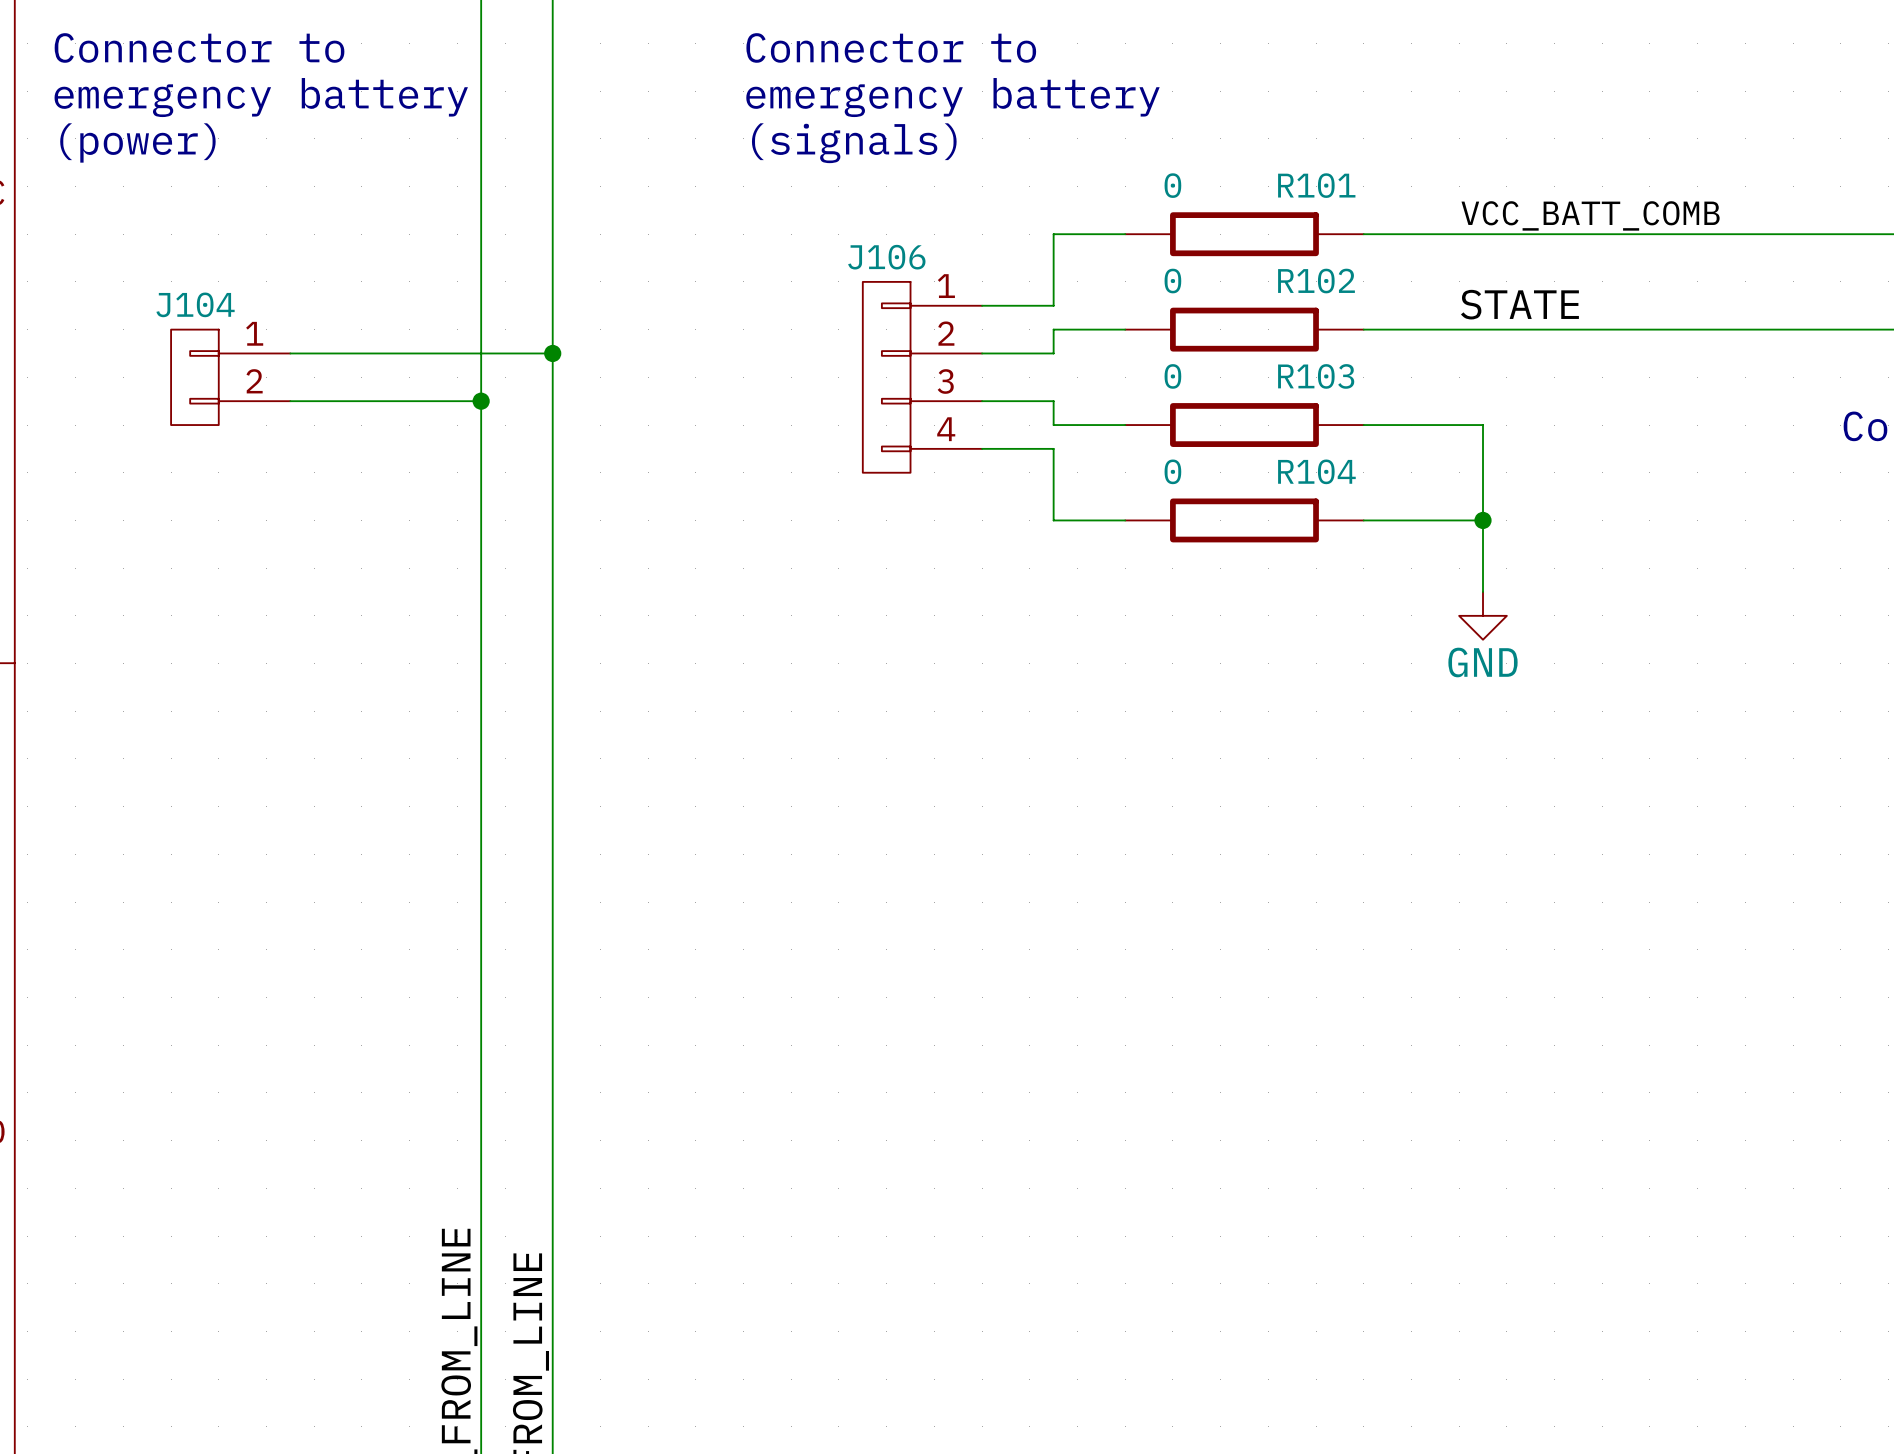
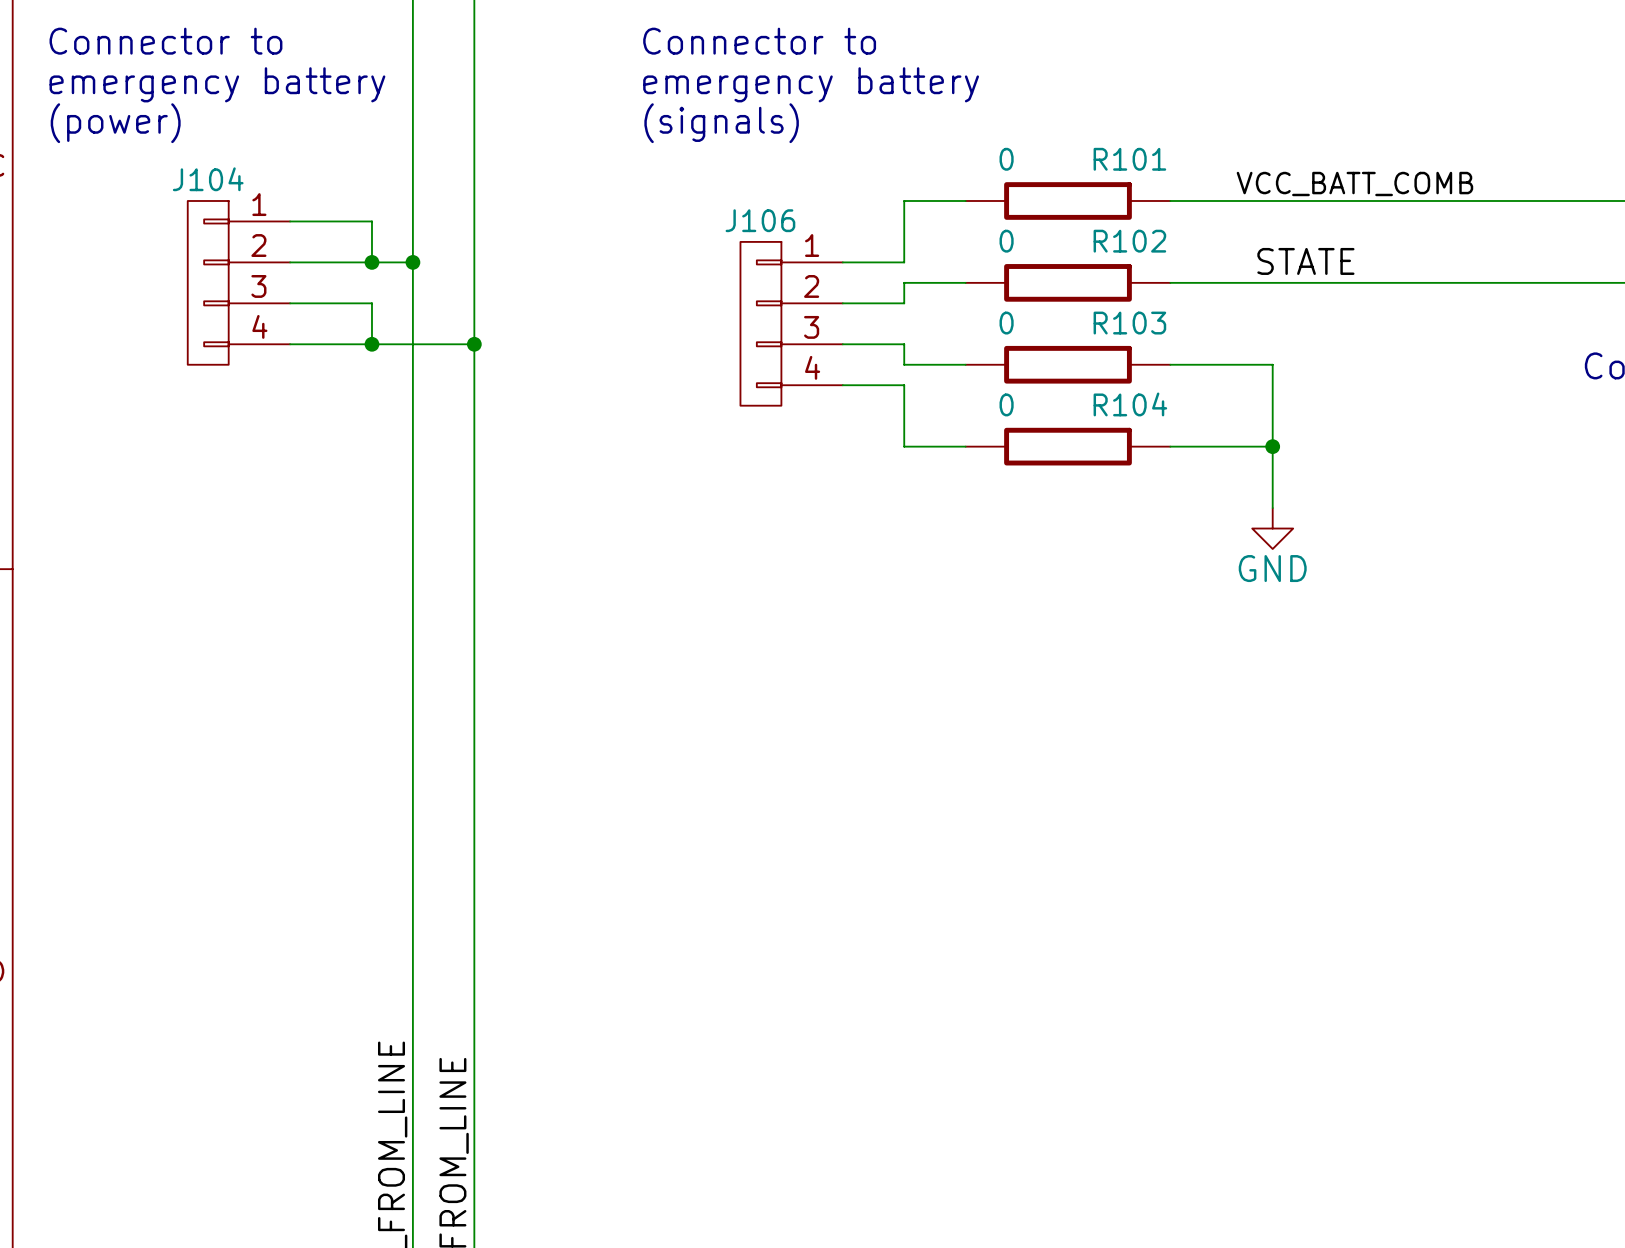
wire: none -> (290, 221) (371, 221) (371, 262)
J104 name position: J104 (195, 304) -> J104 (208, 179)
wire: none -> (290, 262) (412, 262)
junction: none -> (371, 262)
junction: none -> (412, 262)
J104 symbol: [171, 329, 291, 426] -> [187, 200, 291, 365]
wire: (433, 353) (552, 353) -> (371, 303) (371, 344)
junction: (552, 353) -> none
junction: none -> (371, 344)
wire: none -> (412, 344) (474, 344)
junction: (481, 401) -> none
junction: none -> (474, 344)

